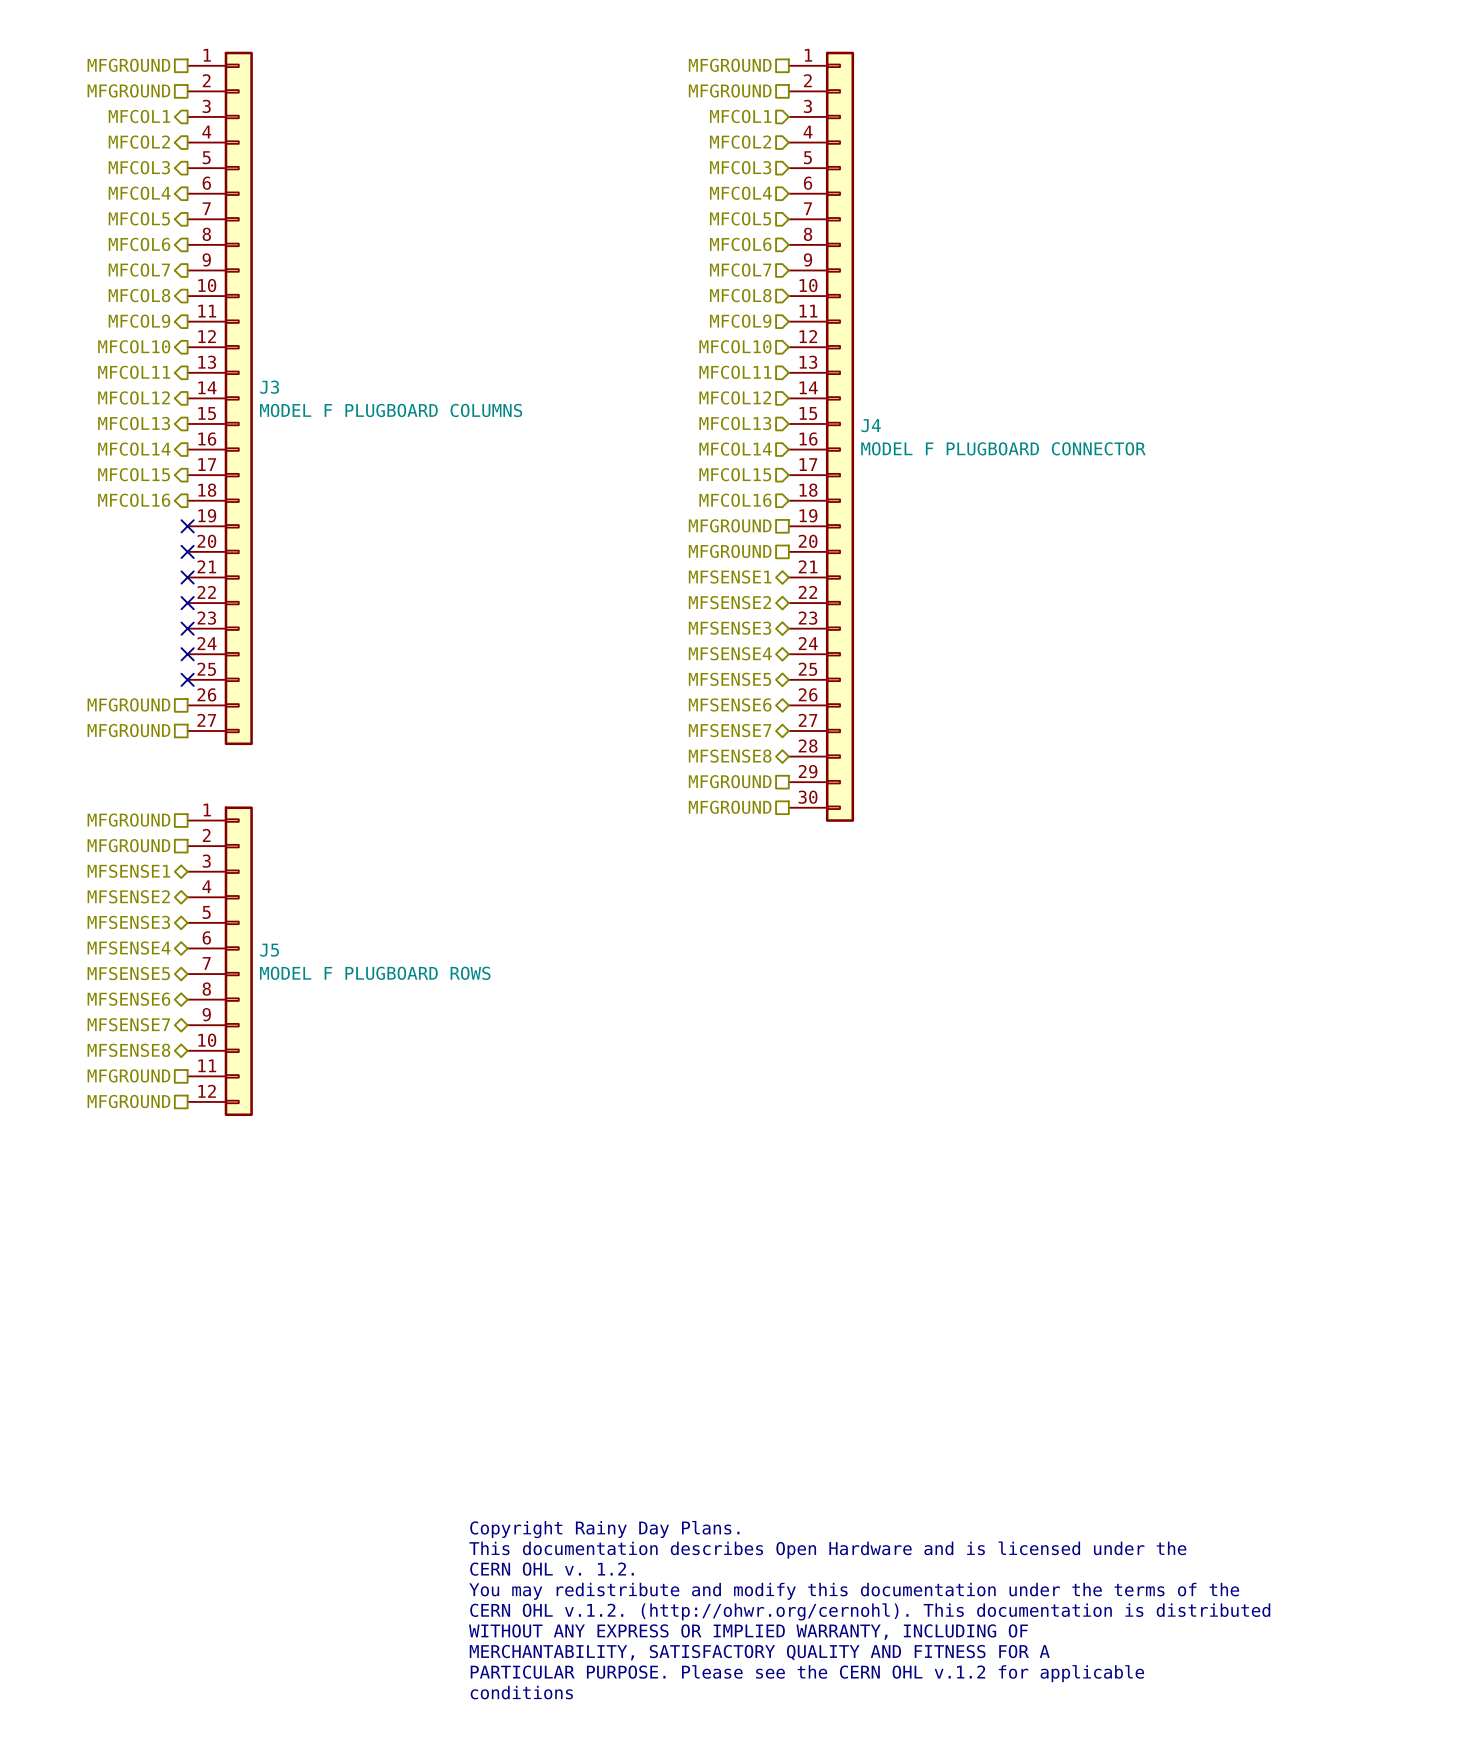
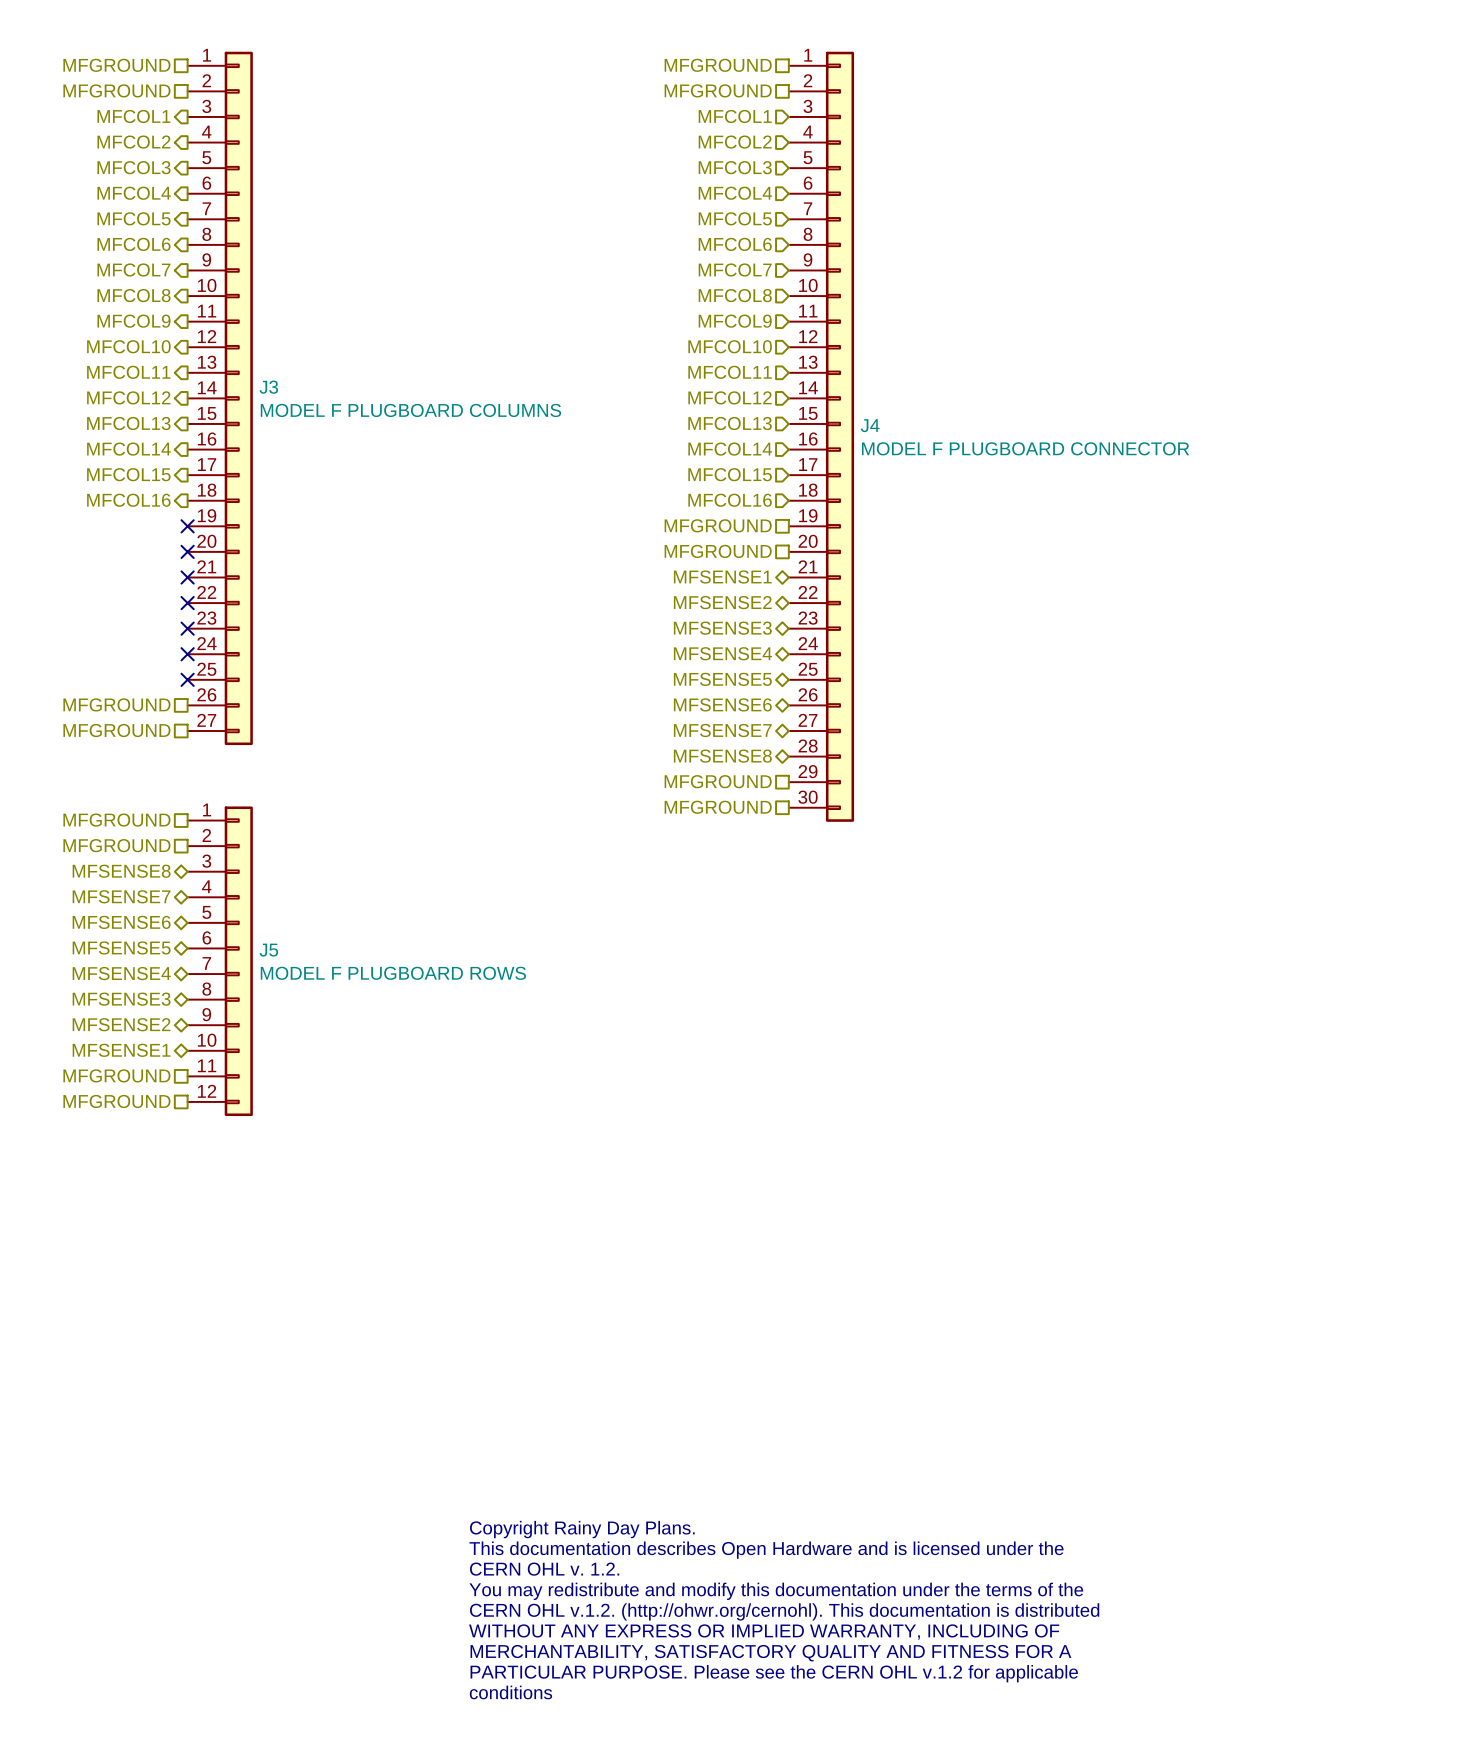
hierarchical label: MFSENSE1 (128, 871) -> MFSENSE8 (121, 871)
hierarchical label: MFSENSE2 (128, 896) -> MFSENSE7 (121, 896)
hierarchical label: MFSENSE3 (128, 922) -> MFSENSE6 (121, 922)
hierarchical label: MFSENSE4 (129, 947) -> MFSENSE5 (121, 947)
hierarchical label: MFSENSE5 (128, 973) -> MFSENSE4 (121, 973)
hierarchical label: MFSENSE6 (128, 999) -> MFSENSE3 (121, 999)
hierarchical label: MFSENSE7 (128, 1024) -> MFSENSE2 (121, 1024)
hierarchical label: MFSENSE8 (128, 1050) -> MFSENSE1 (121, 1050)

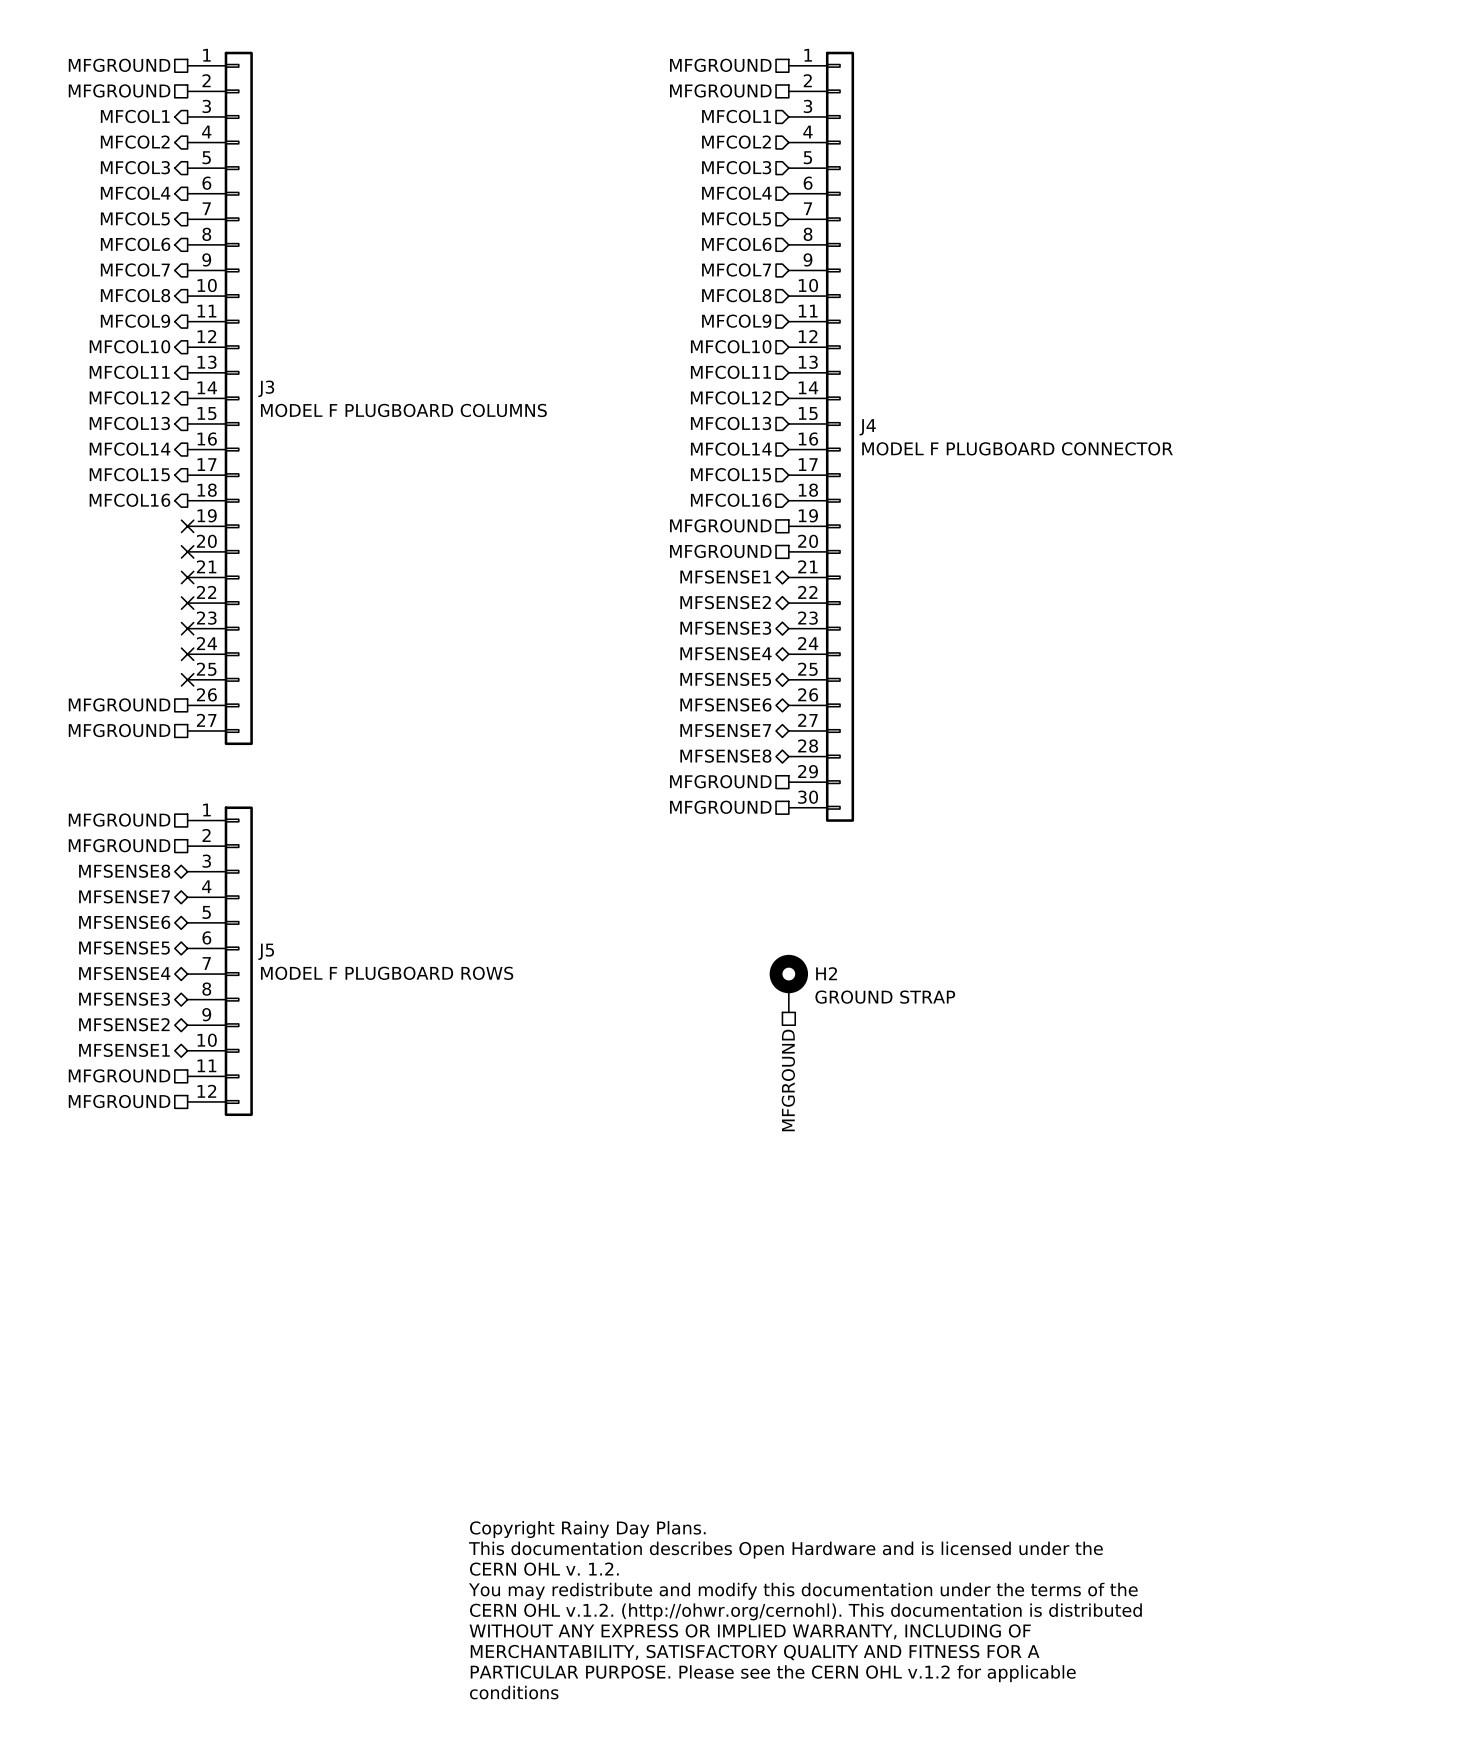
H2: none -> GROUND STRAP (788, 983)
hierarchical label: none -> MFGROUND (788, 1080)

